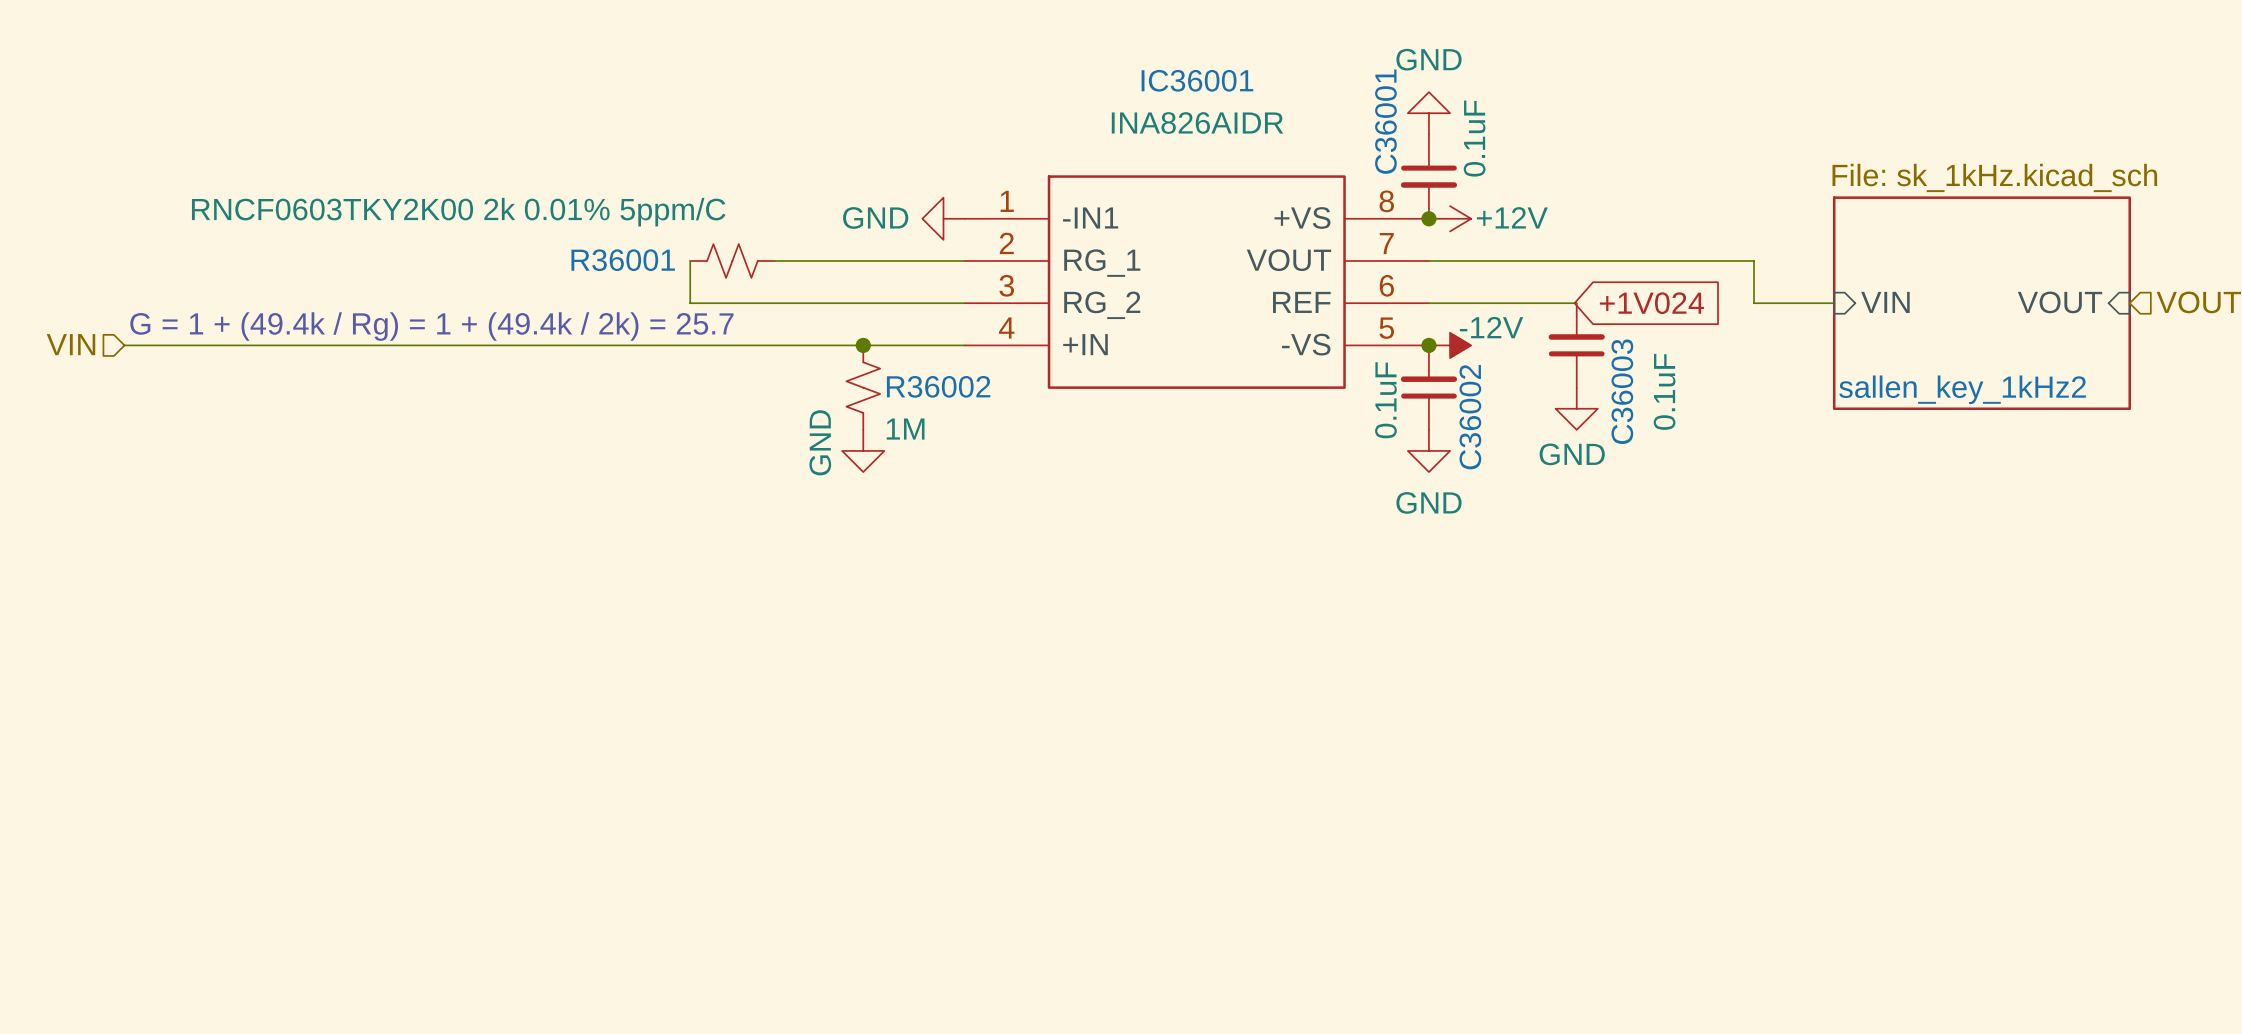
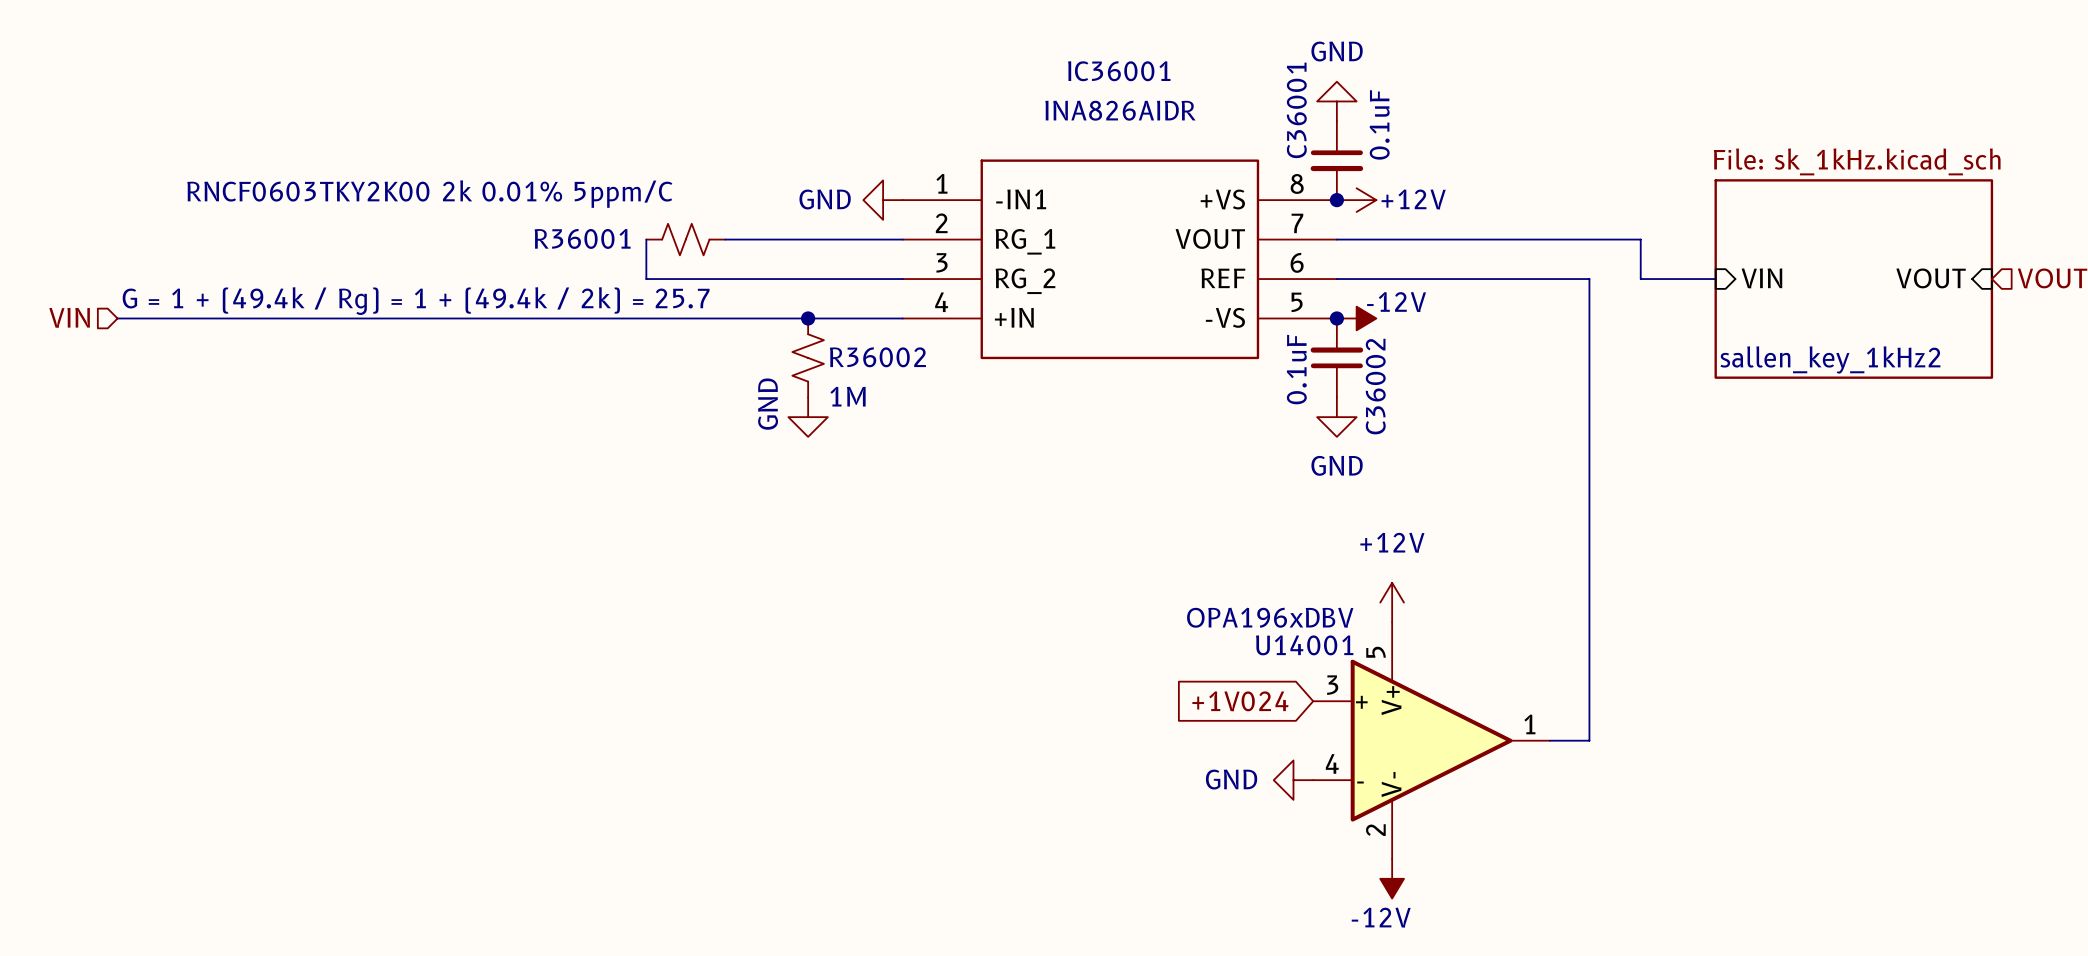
wire: none -> (1475, 279) (1589, 279) (1589, 740) (1549, 740)
global label: +1V024 (1651, 303) -> none
C36003: 0.1uF (1576, 345) -> none
power symbol: GND (1576, 408) -> none
power symbol: none -> +12V (1392, 602)
global label: none -> +1V024 (1240, 701)
U14001: none -> OPA196xDBV (1431, 740)
power symbol: none -> GND (1293, 780)
power symbol: none -> -12V (1392, 878)

